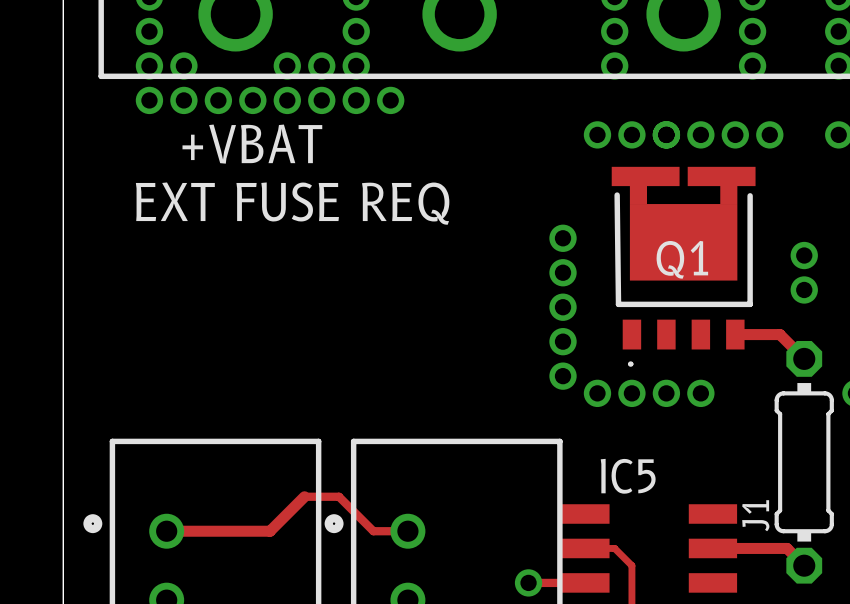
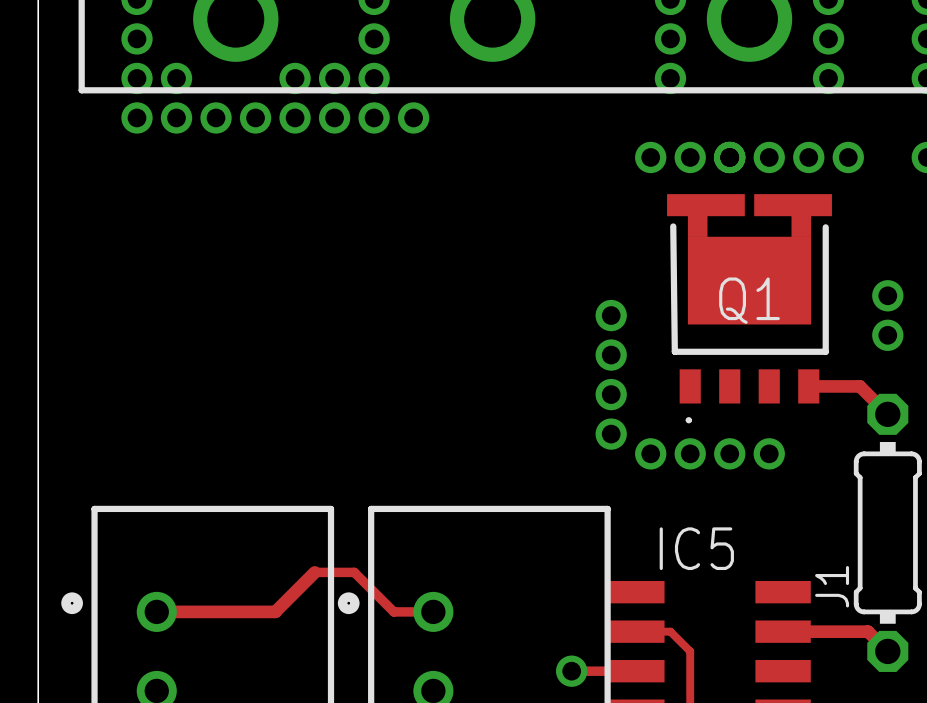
text: +VBAT (252, 144) -> none
text: EXT FUSE REQ (292, 203) -> none
via: (563, 238) -> none

